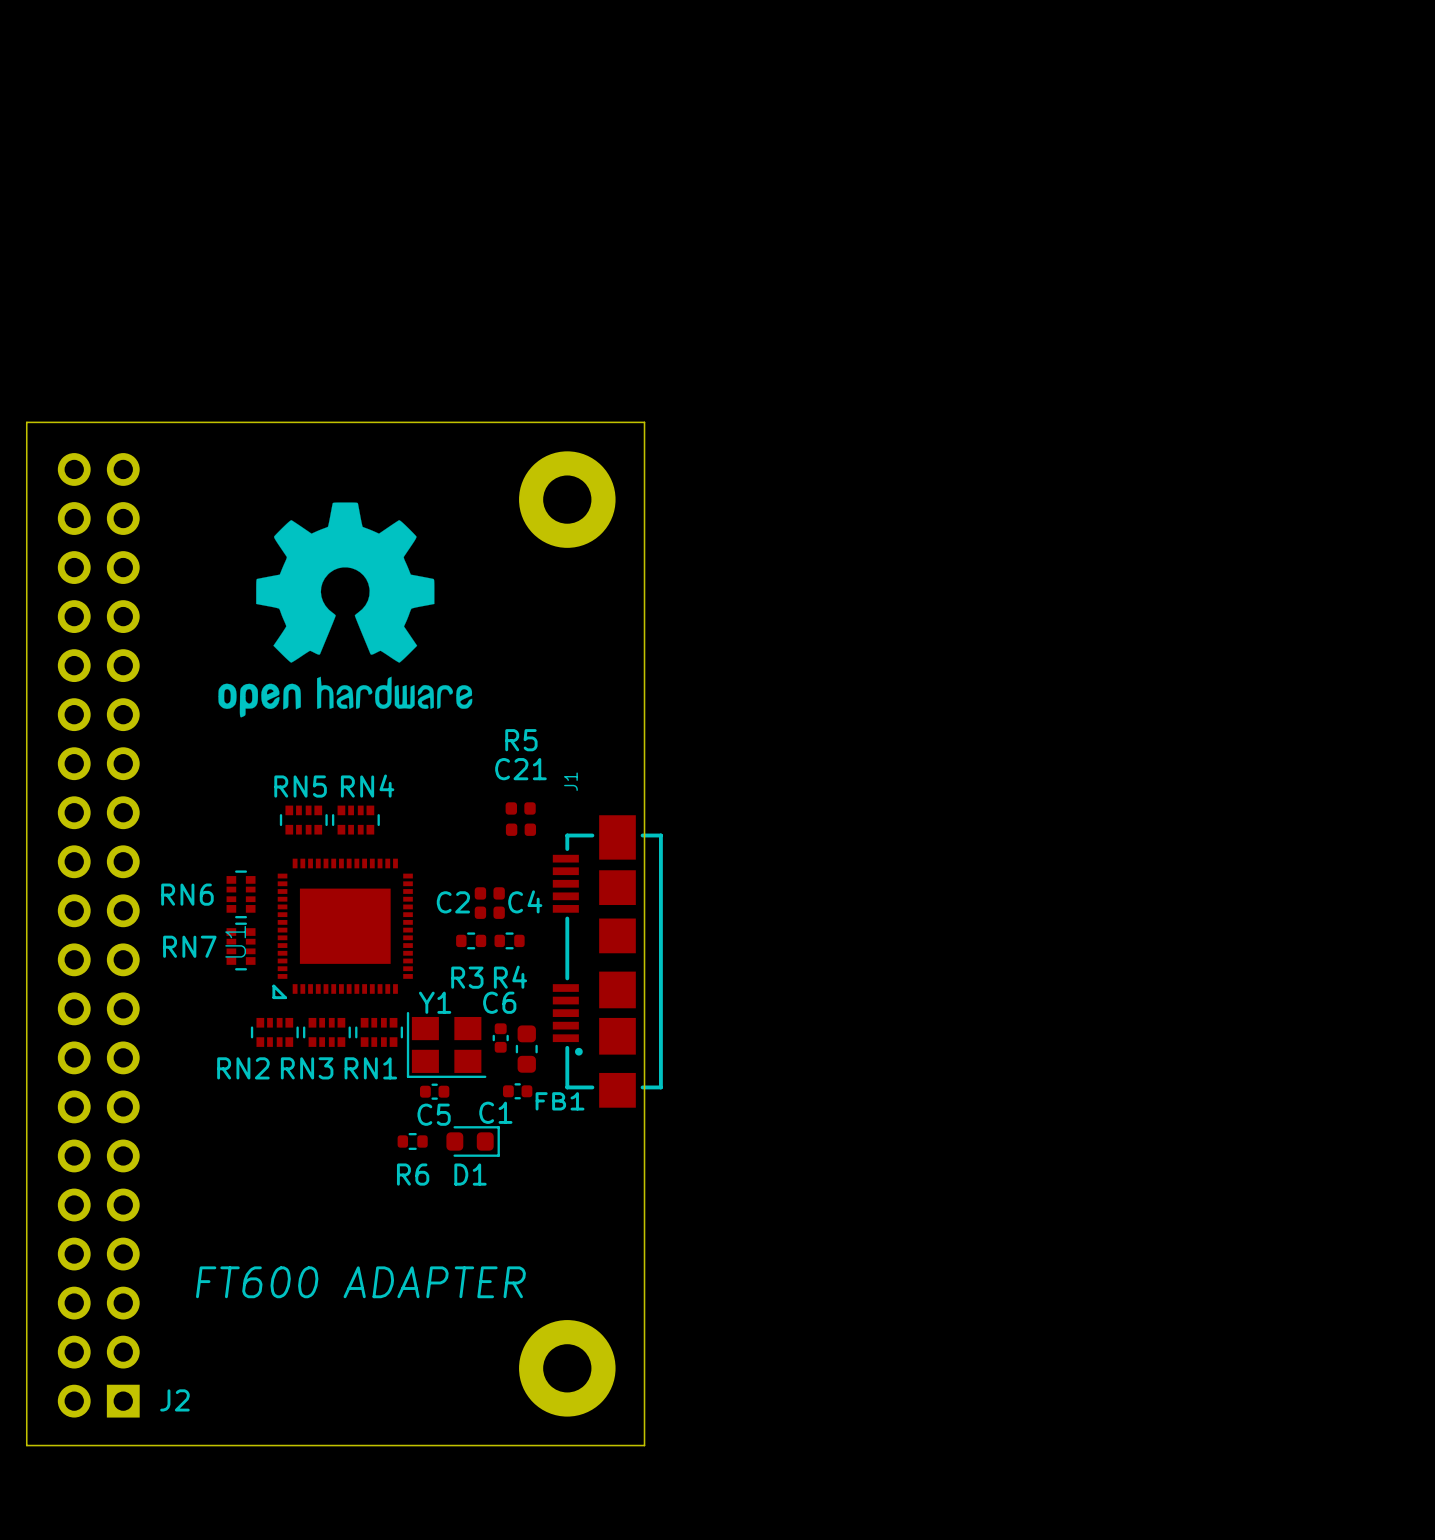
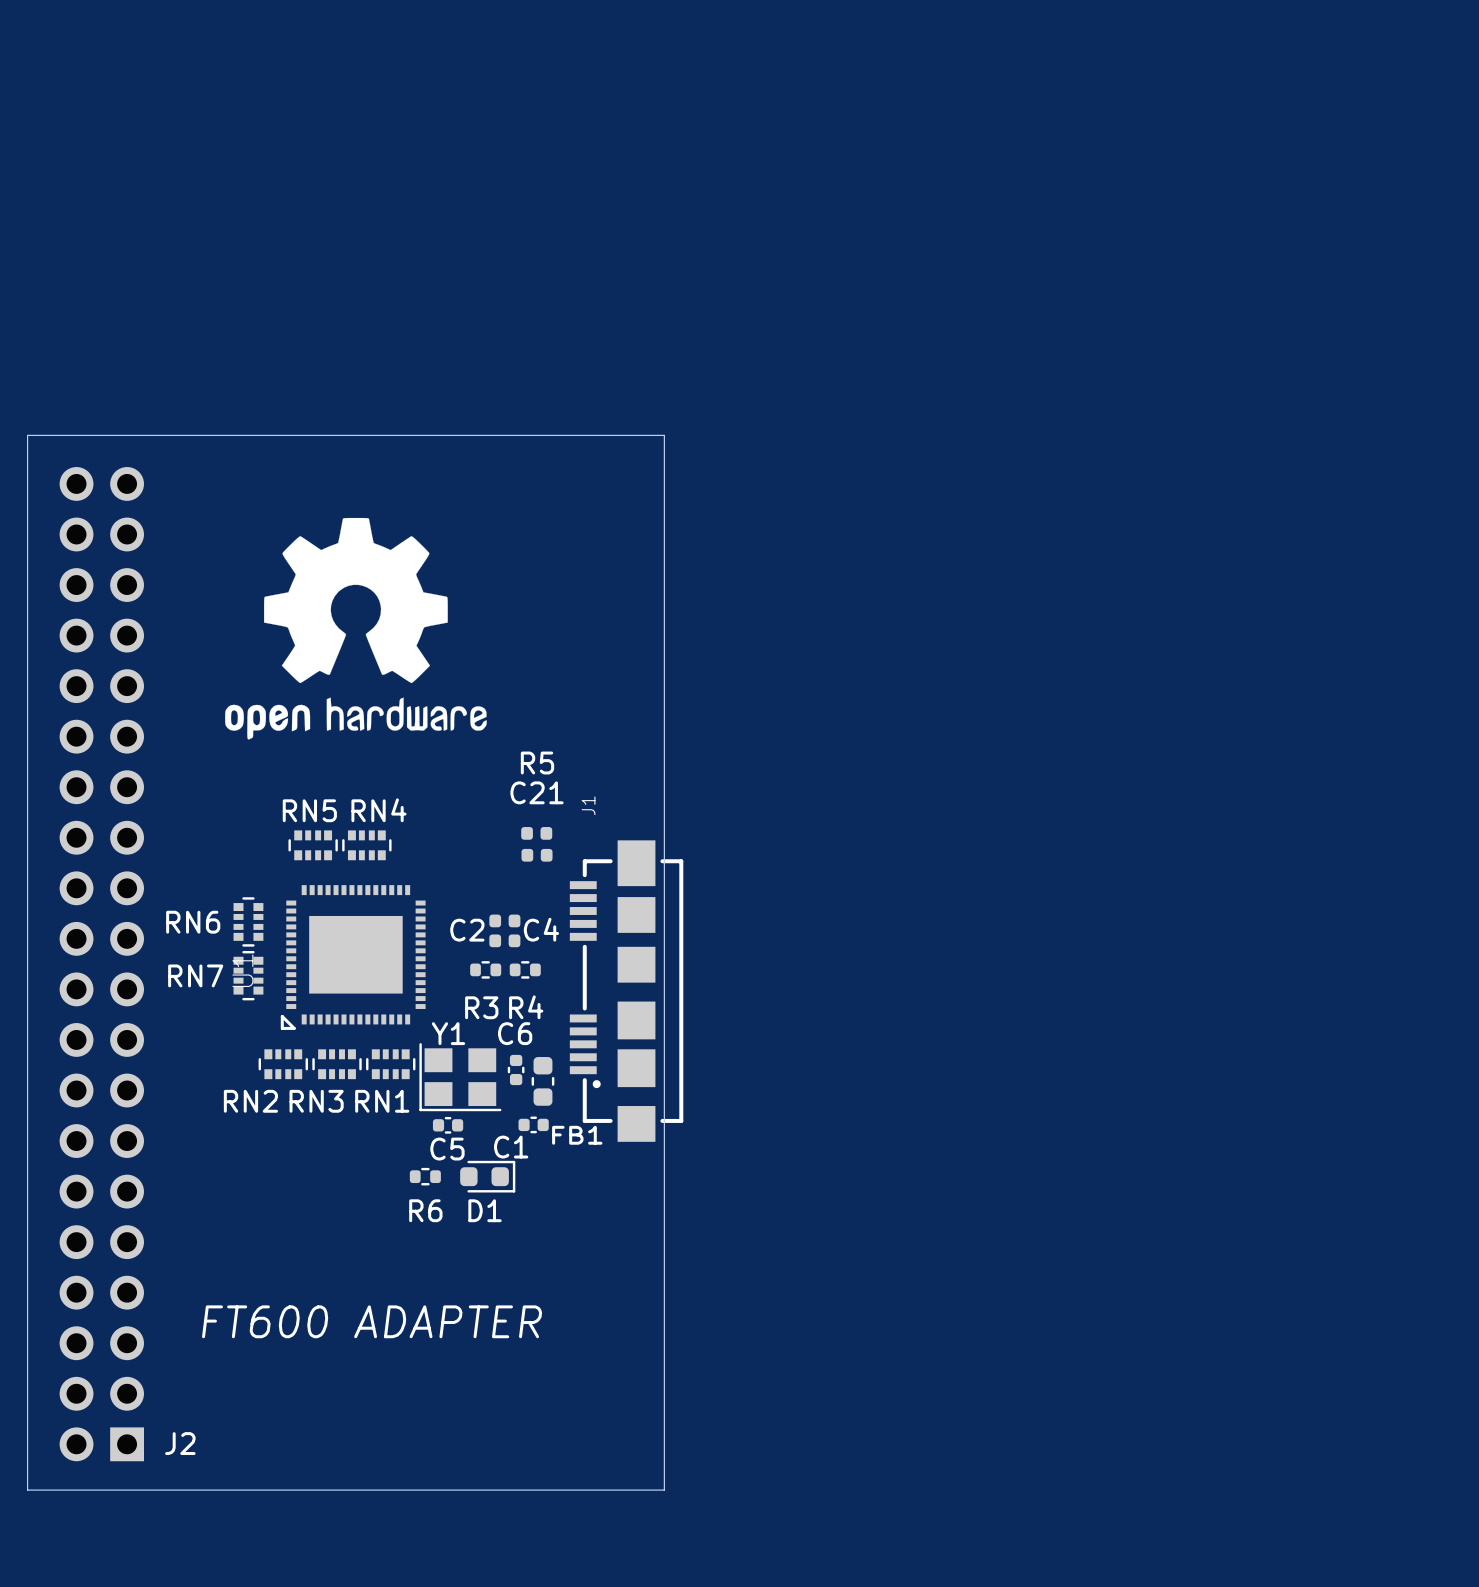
part: (567, 499) -> none
part: (567, 1368) -> none

